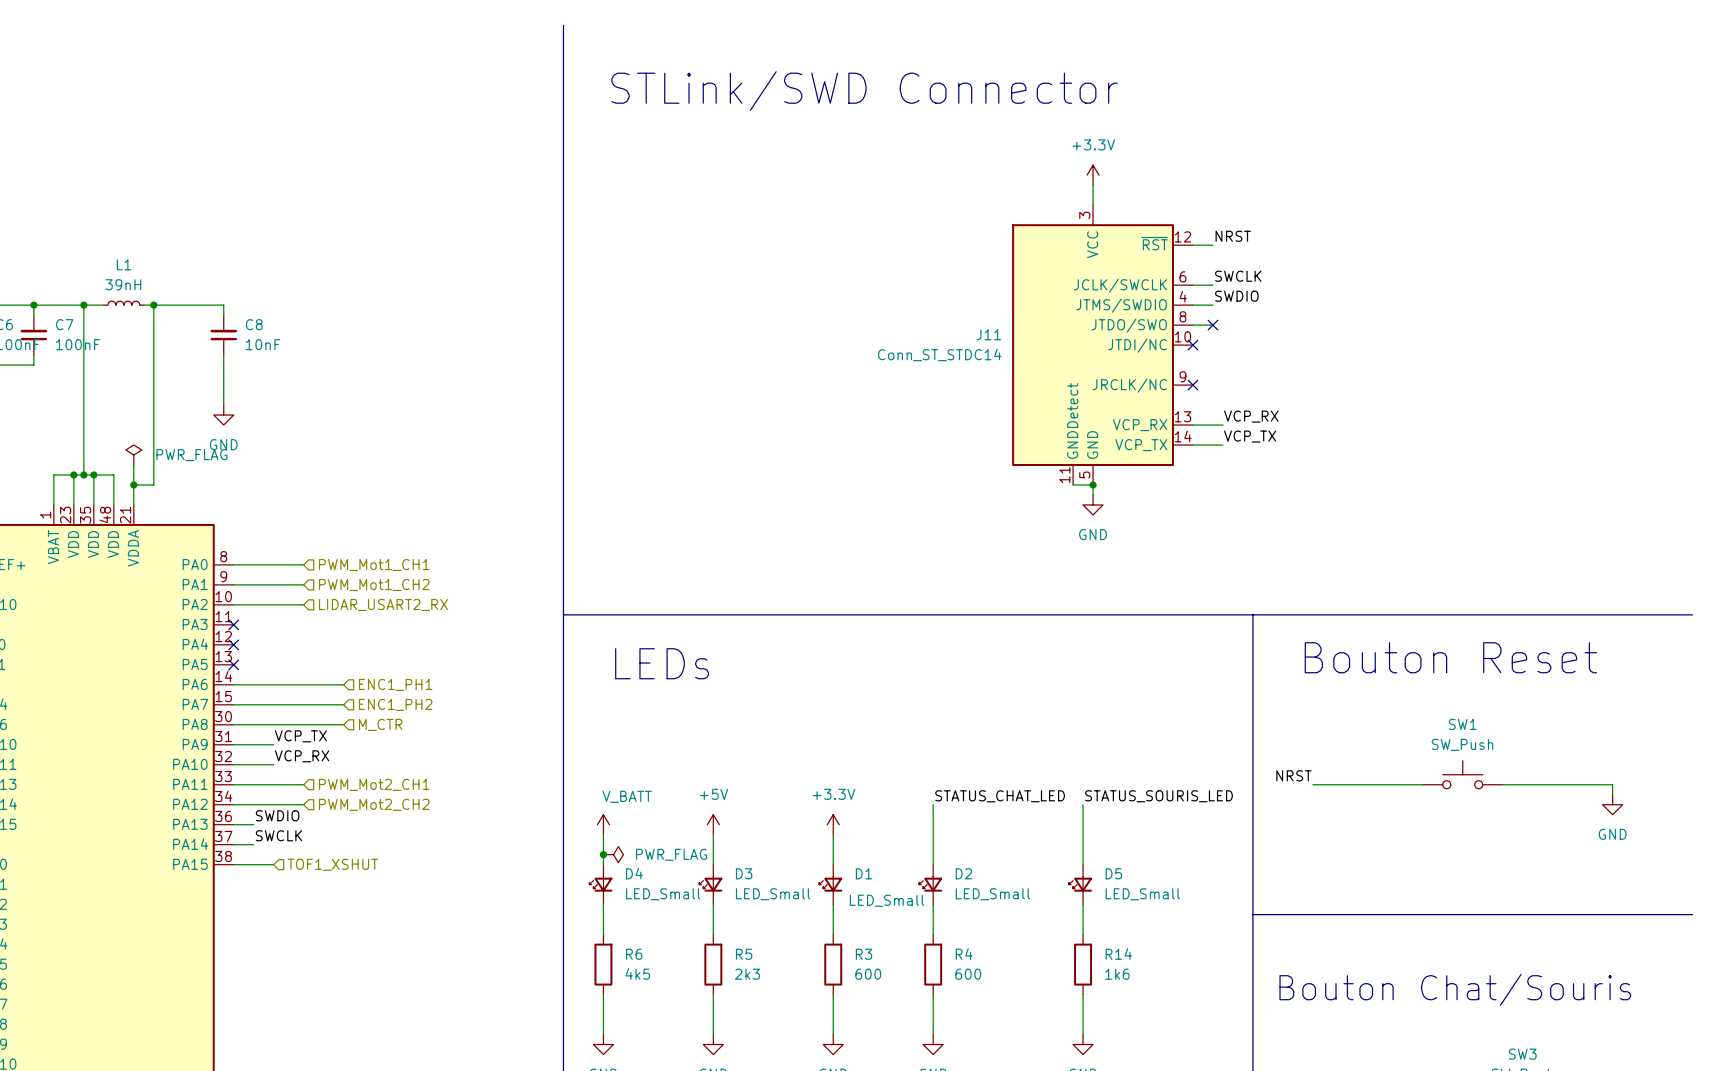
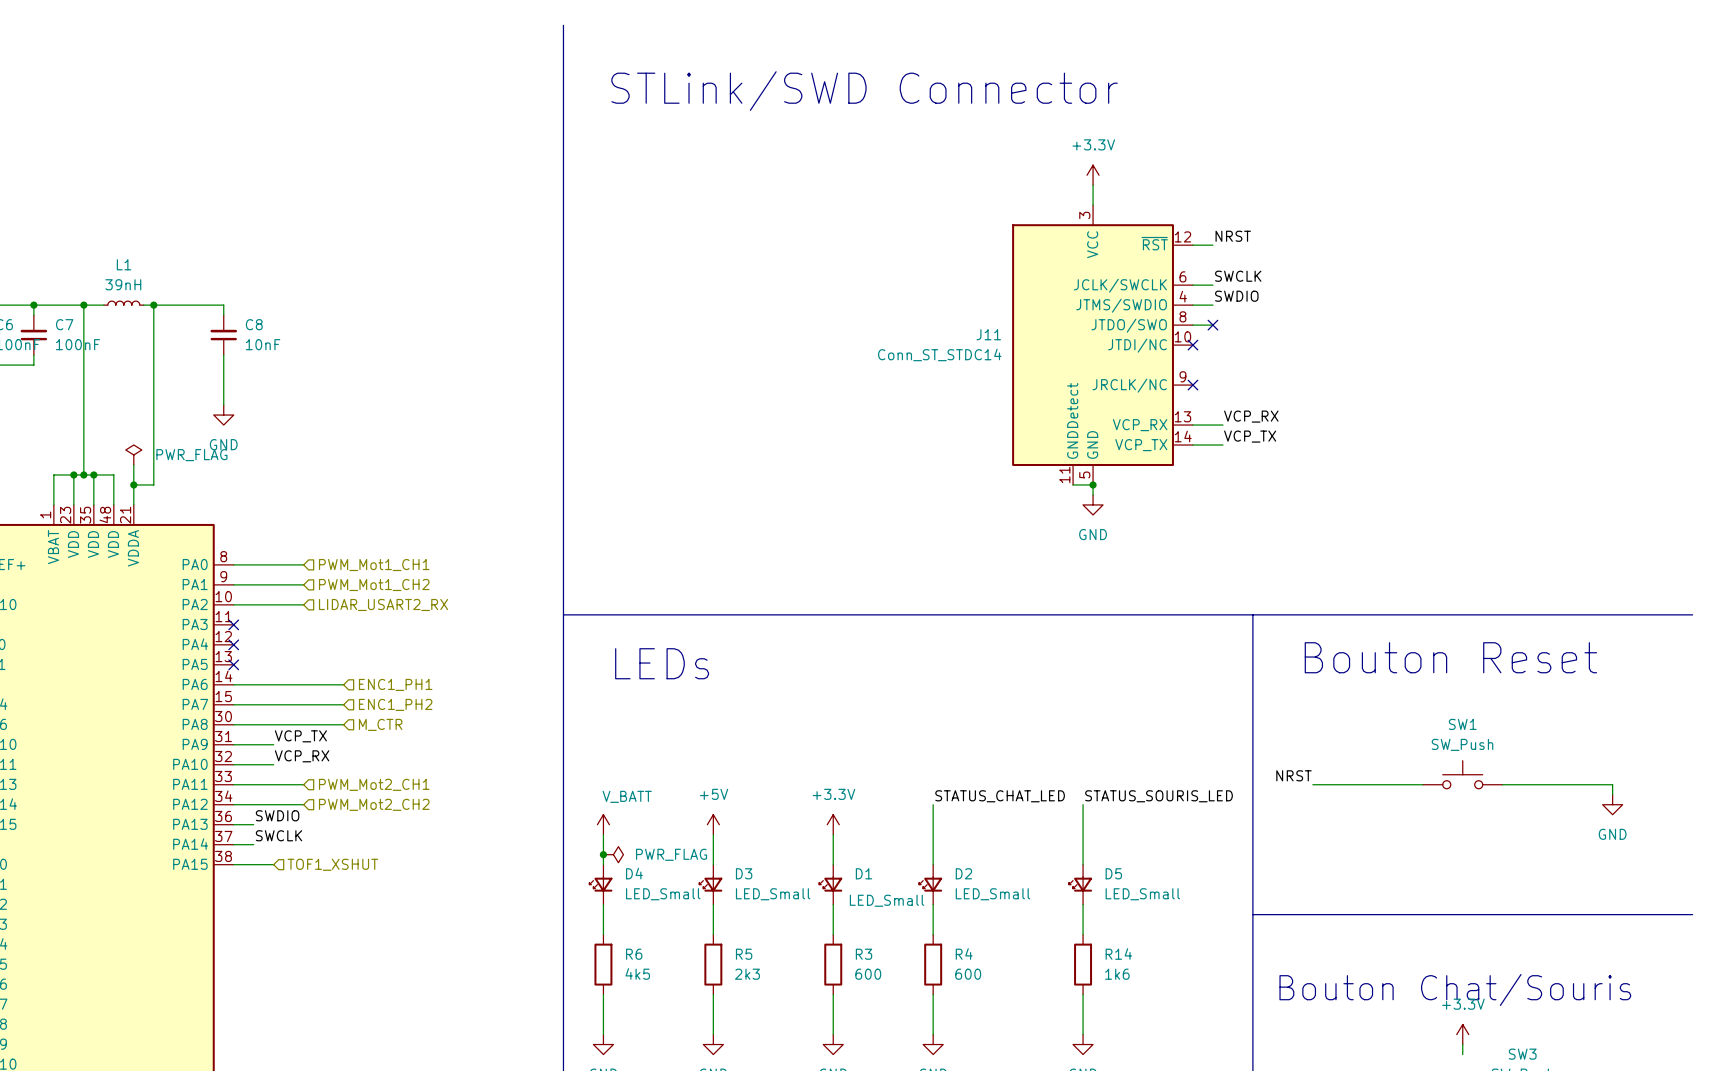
power symbol: none -> +3.3V (1462, 1034)
wire: none -> (1462, 1044) (1462, 1054)

